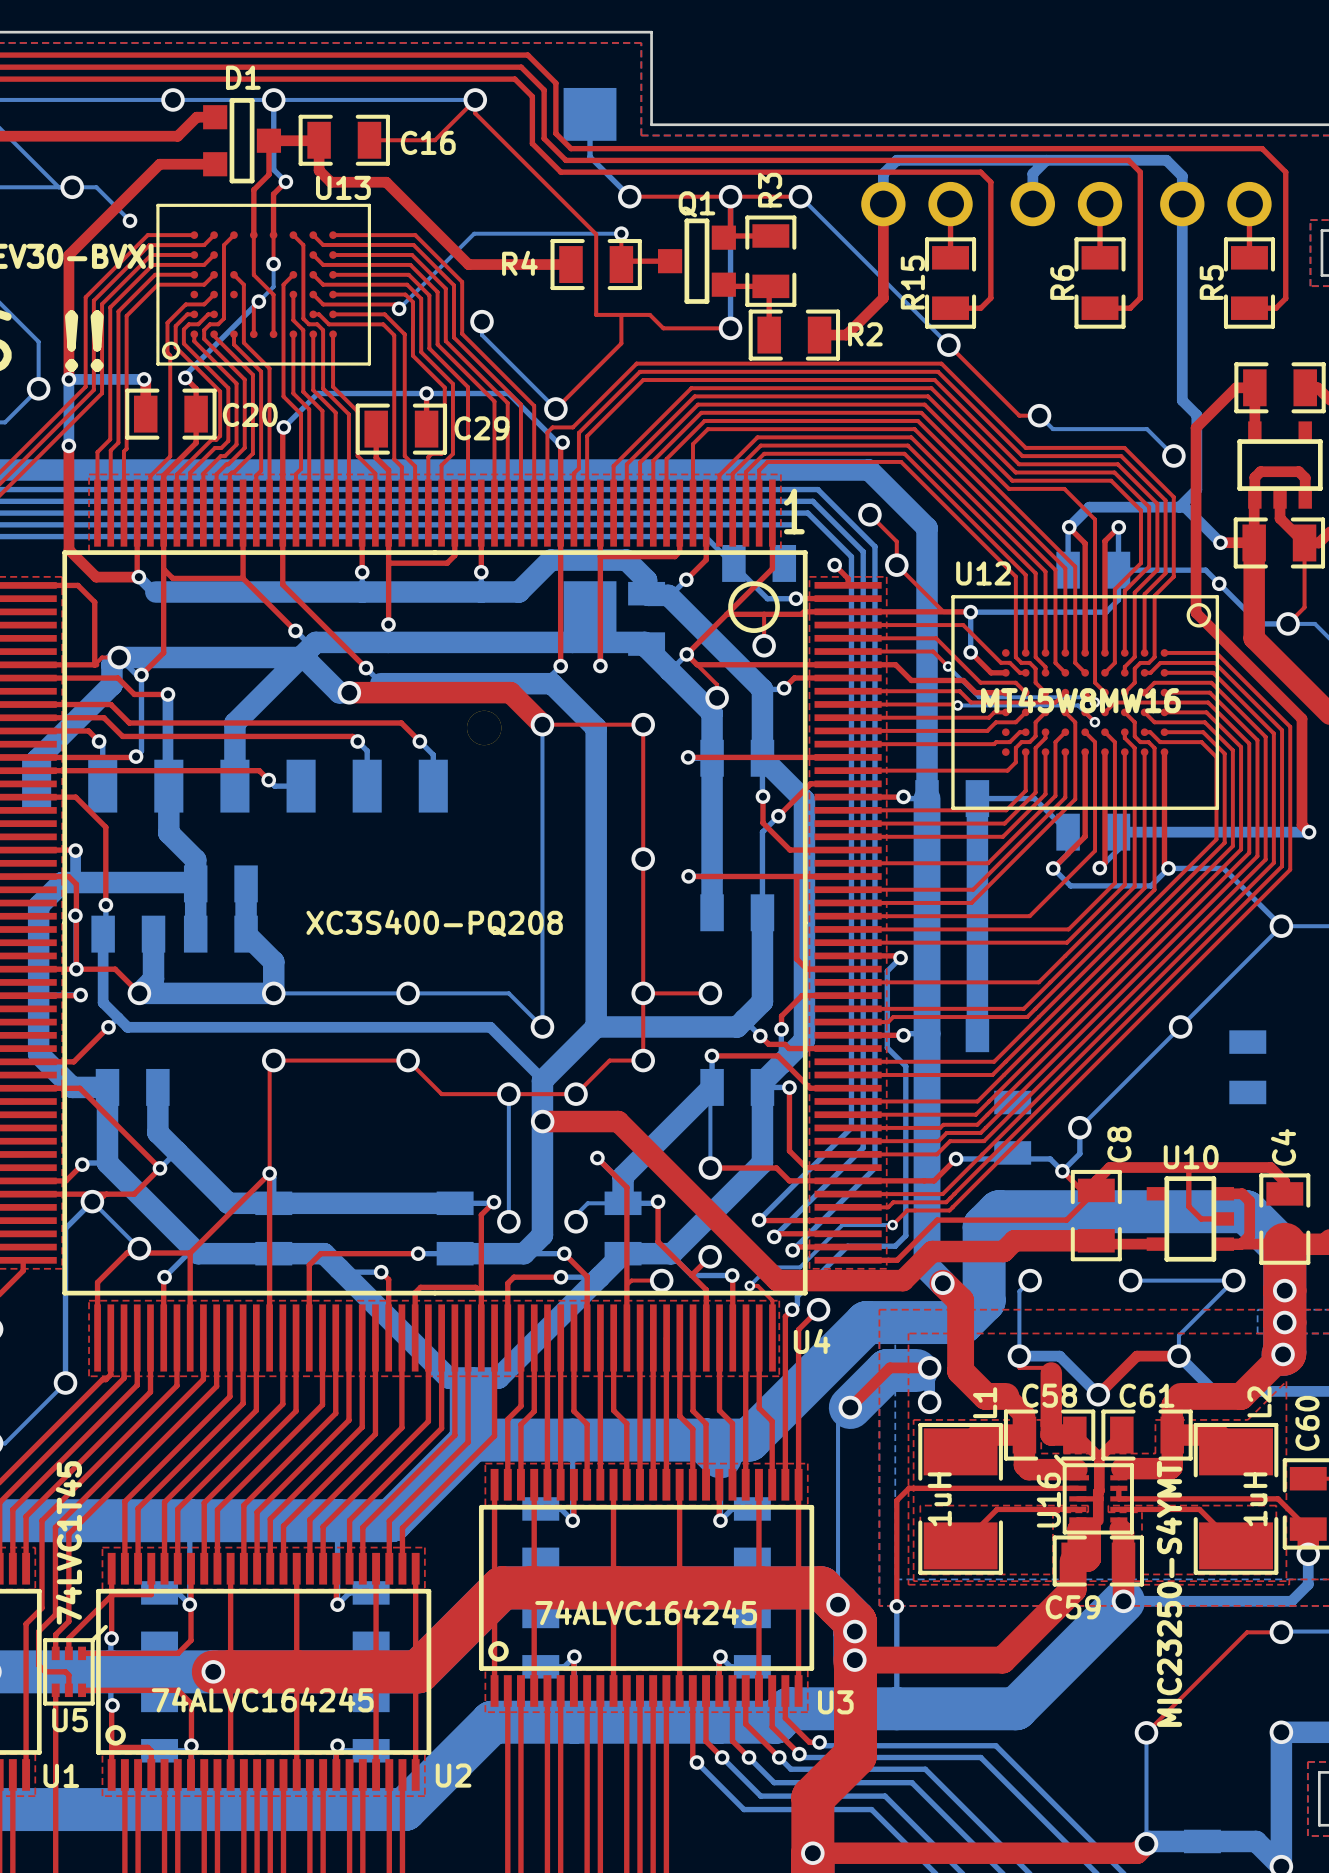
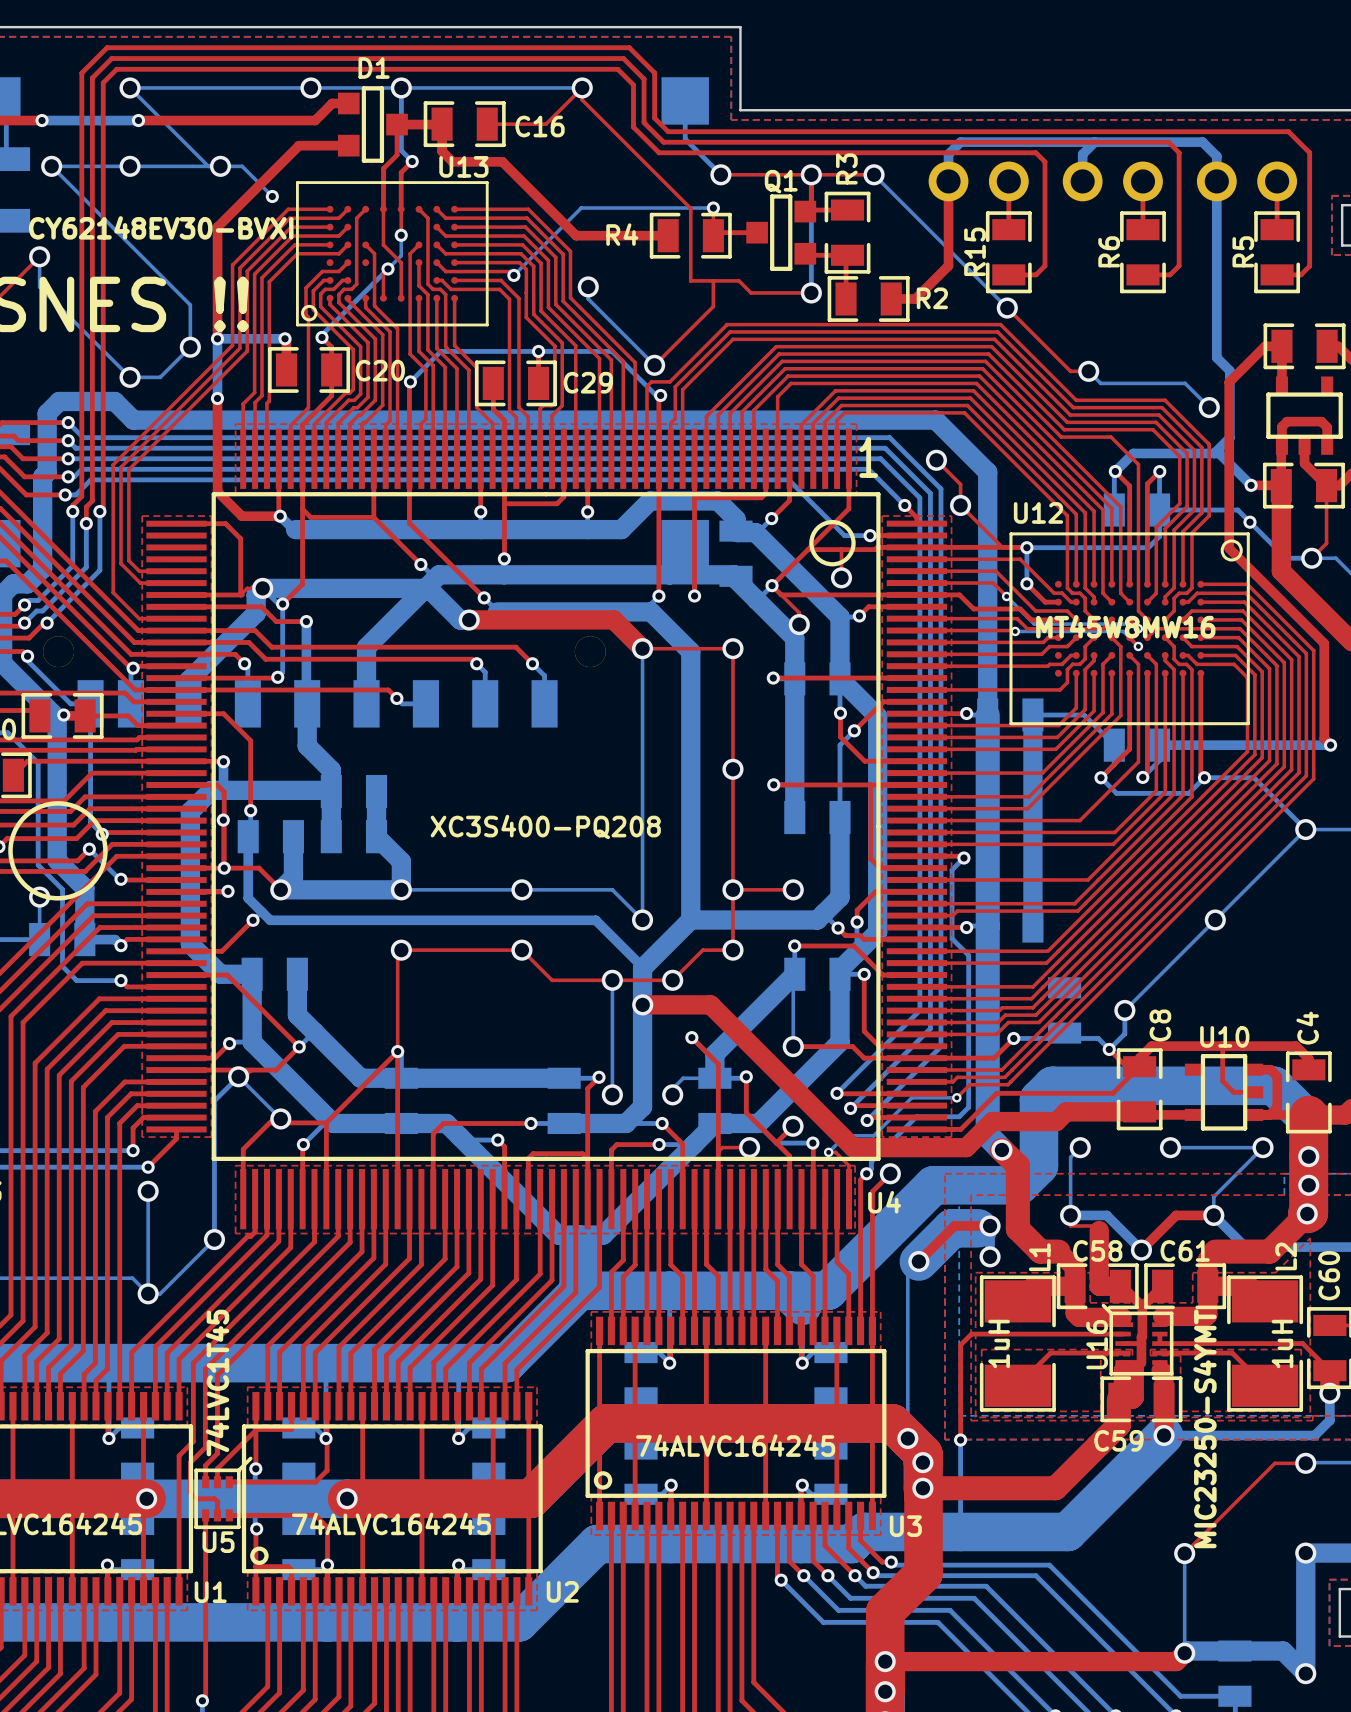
bottom track: none -> (868, 469) (904, 505)
part: (759, 563) -> none
part: (1247, 1067) -> none

